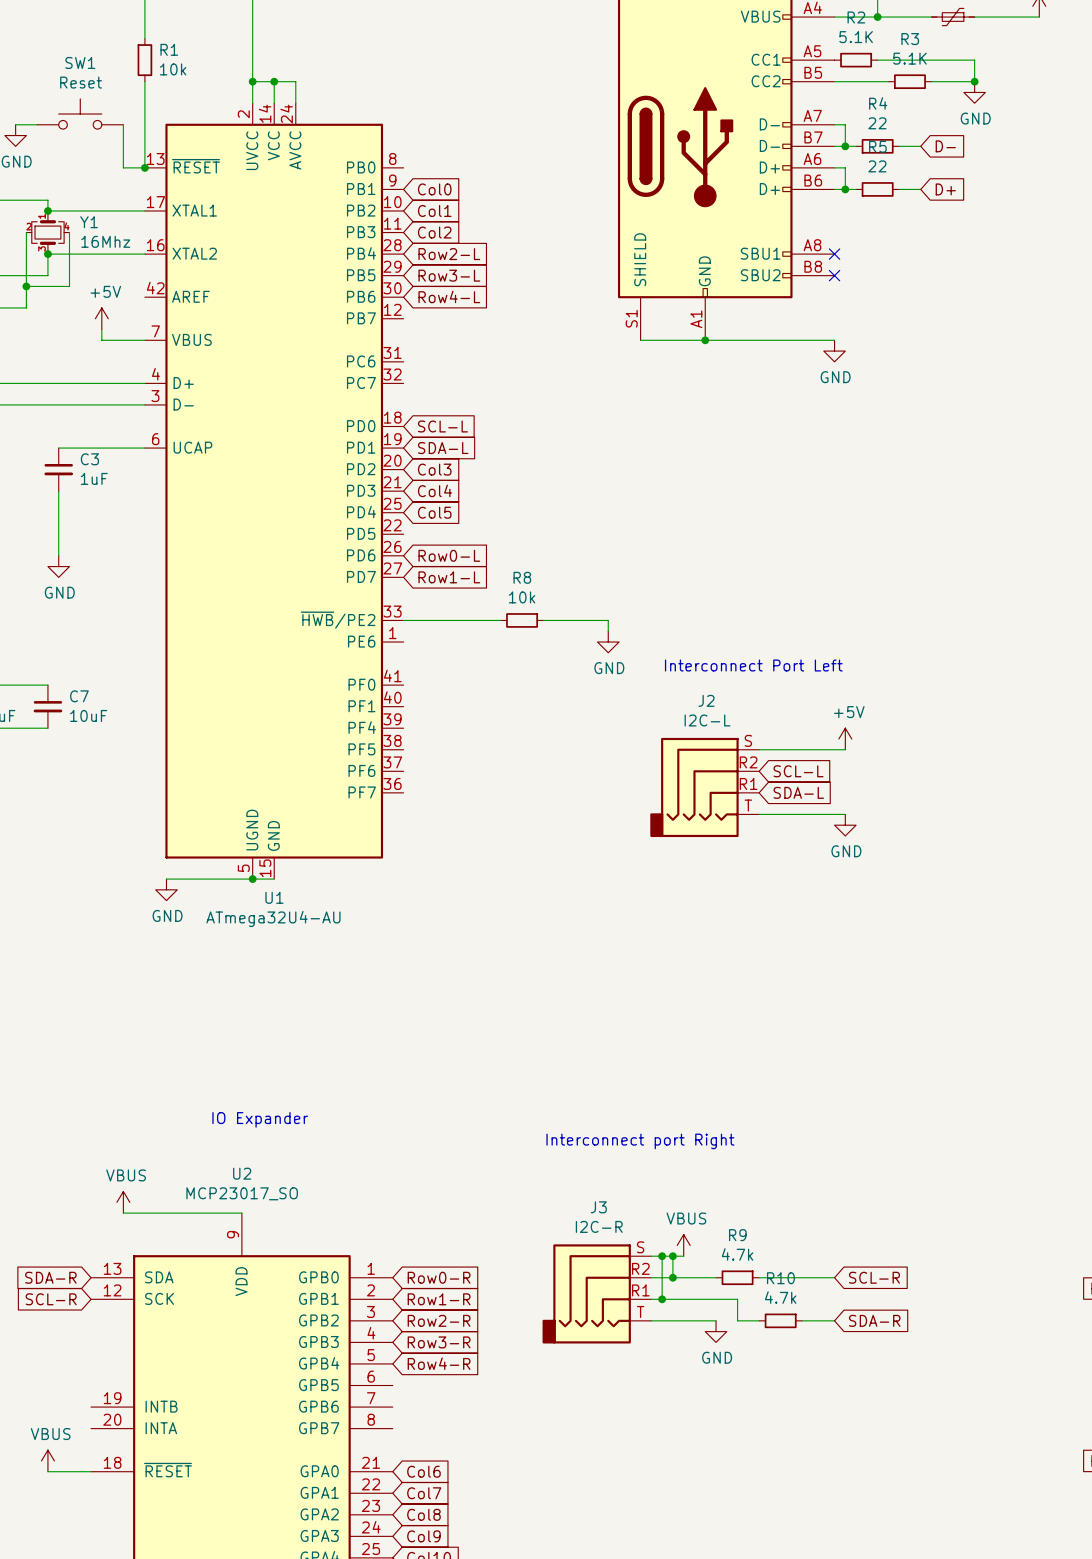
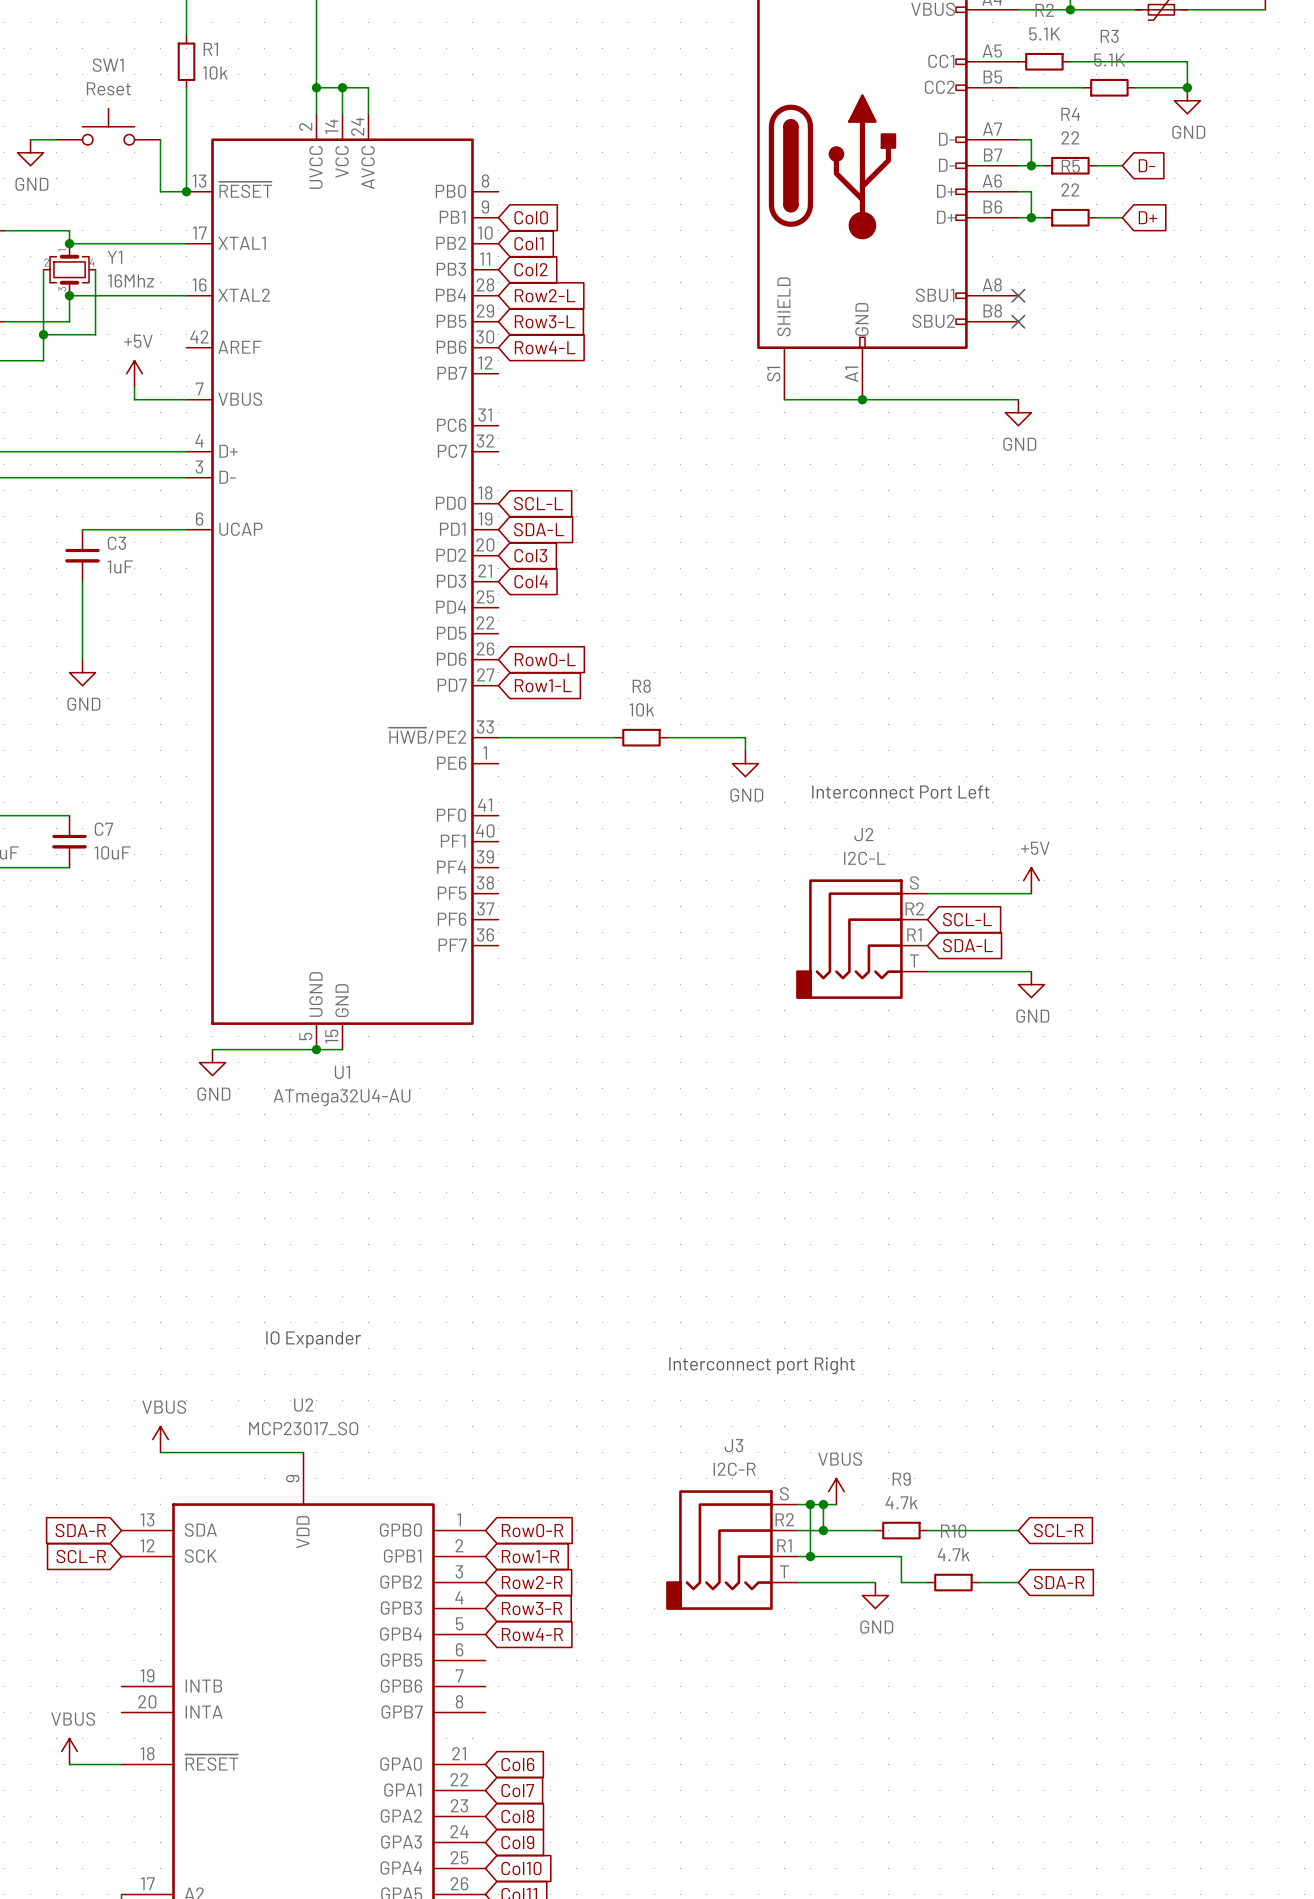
global label: Col5 (434, 512) -> none

